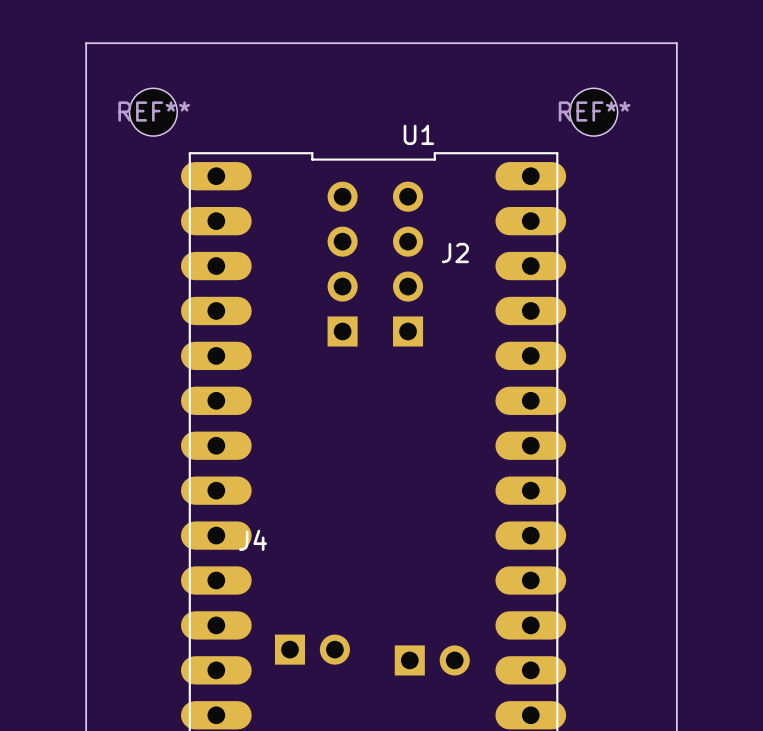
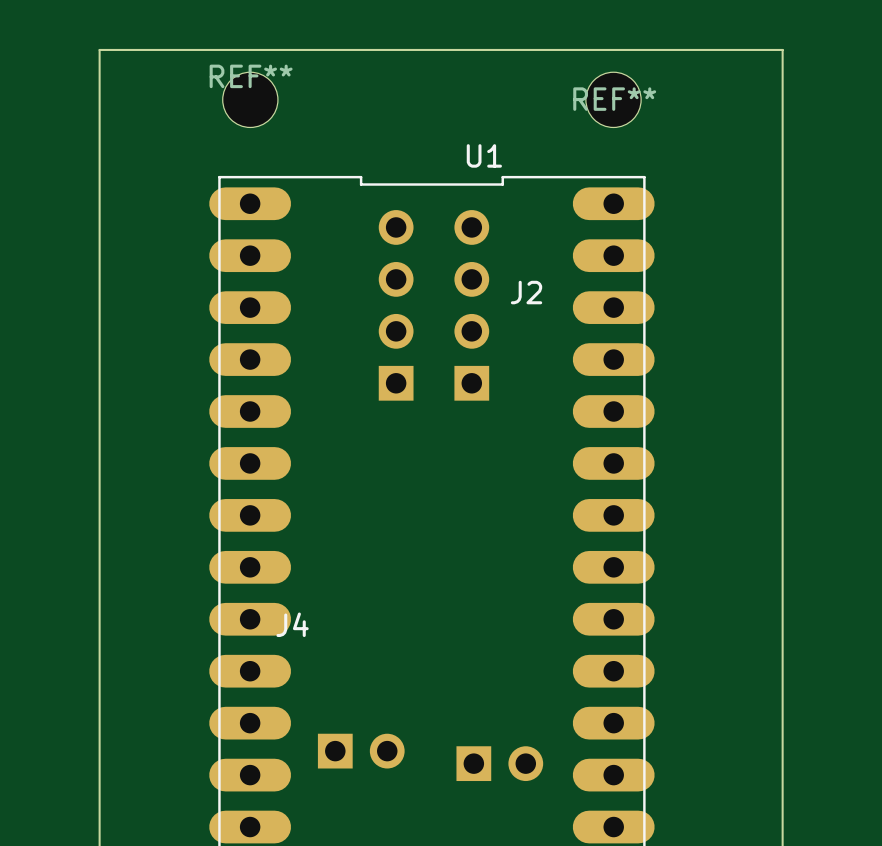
REF** name position: REF** (154, 111) -> REF** (251, 76)
REF** position: (153, 112) -> (250, 99)
REF** position: (593, 112) -> (613, 99)

